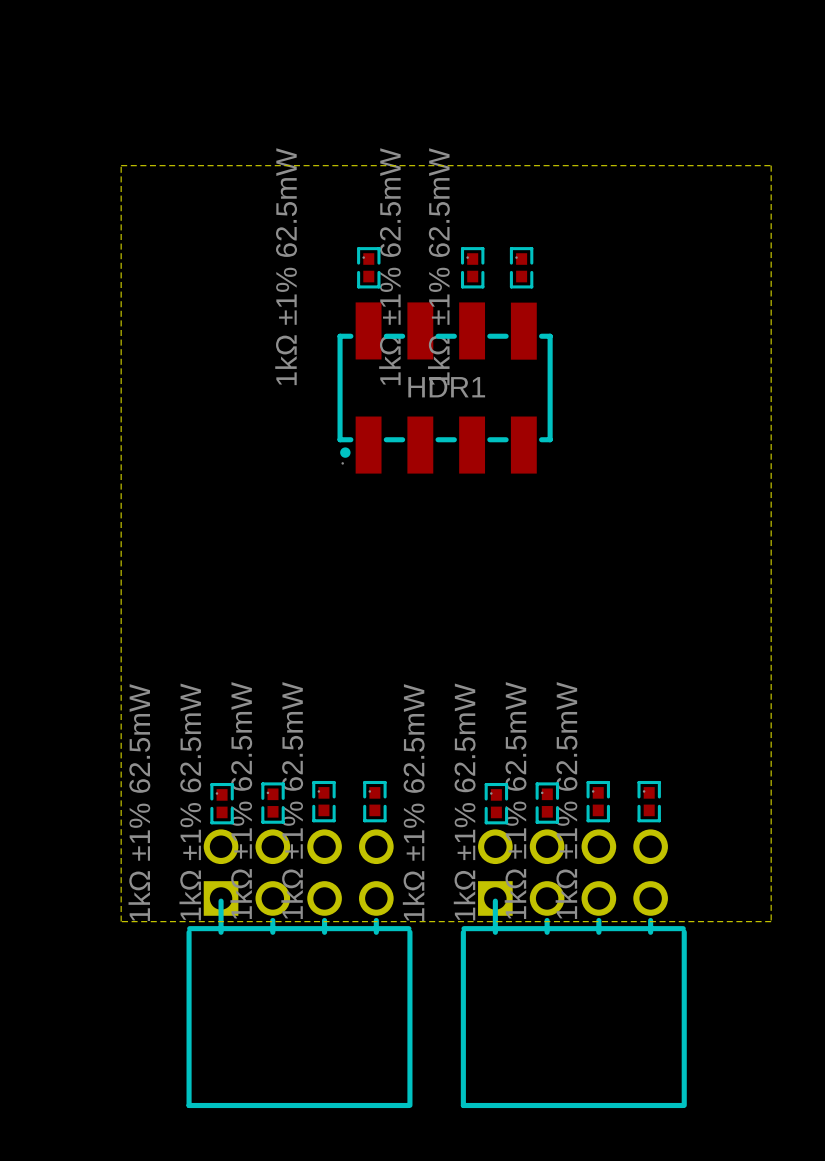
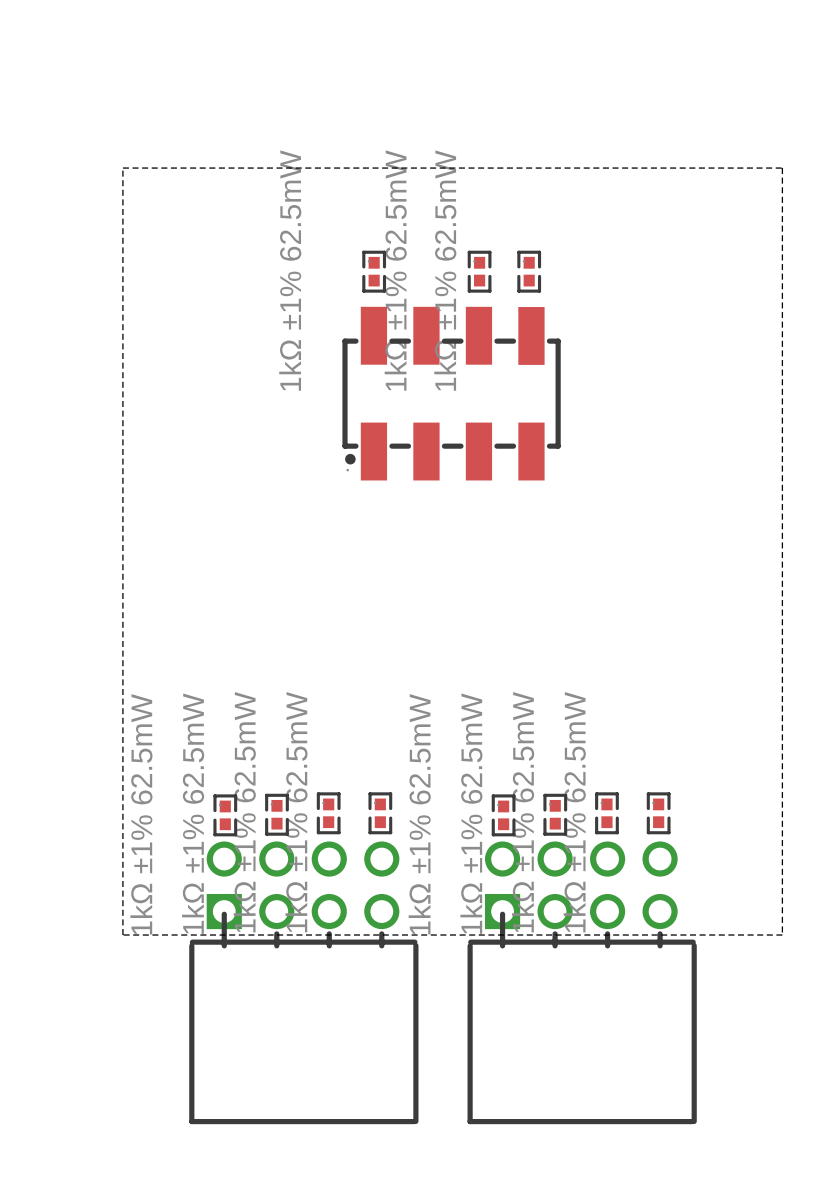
HDR1 name: HDR1 (446, 387) -> none

